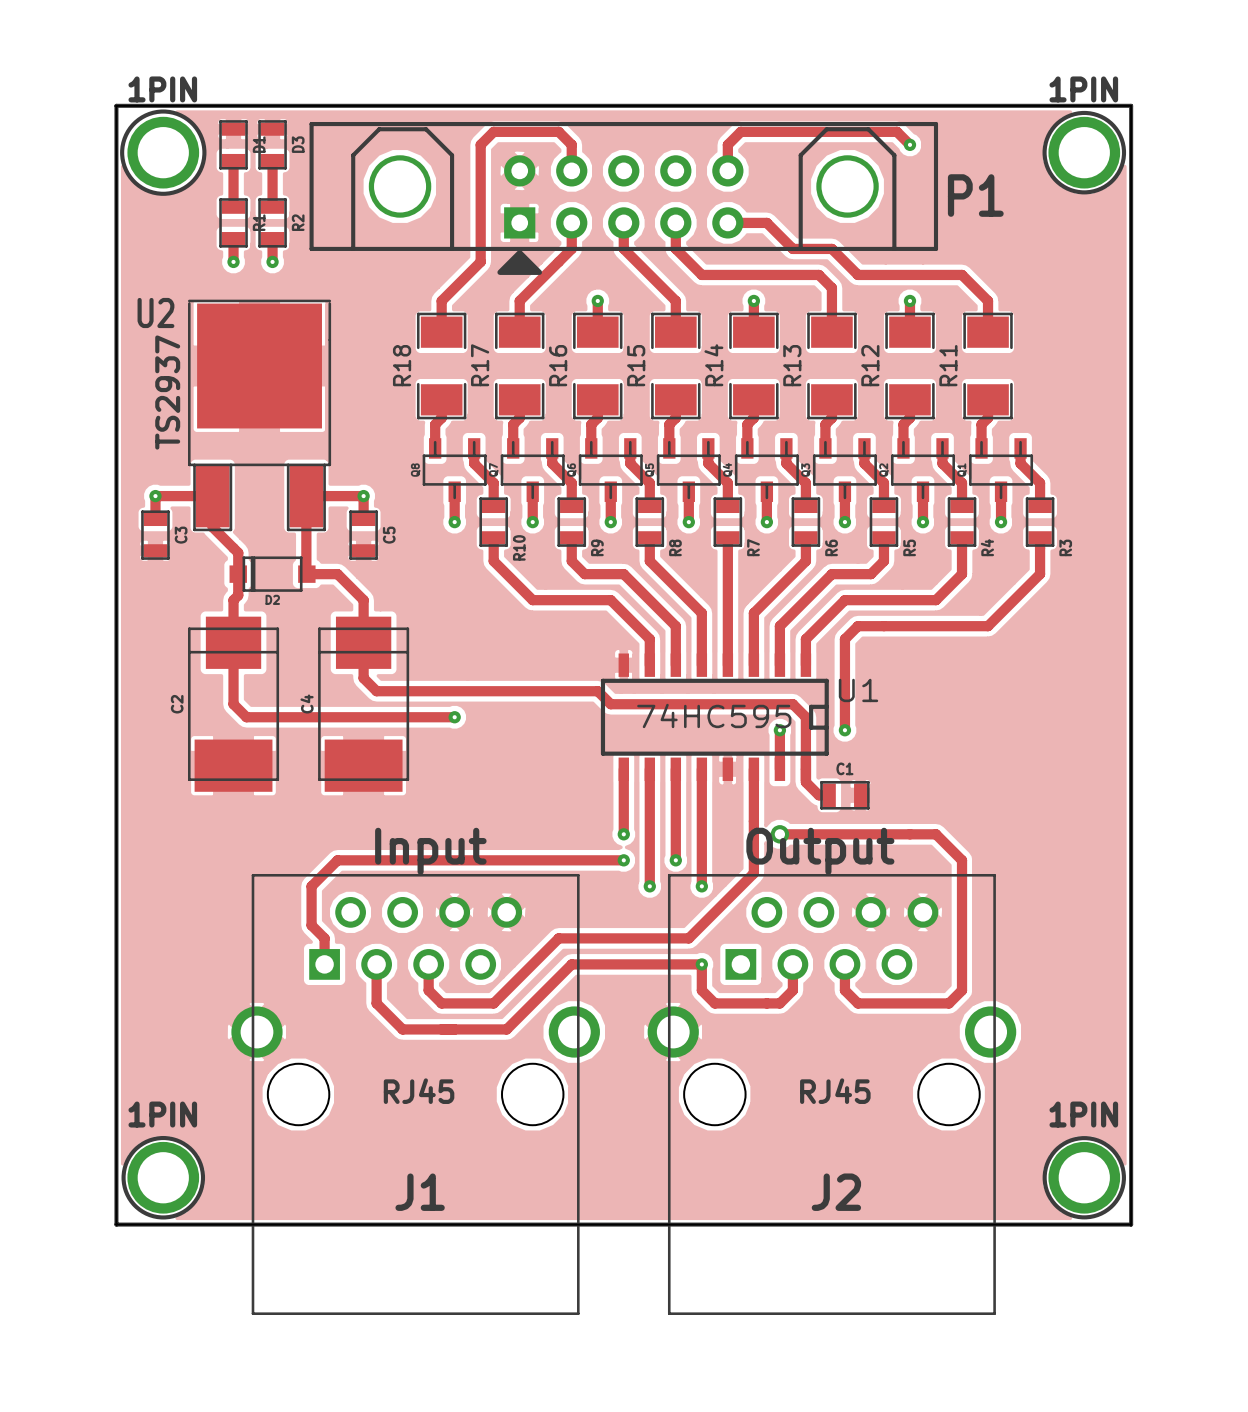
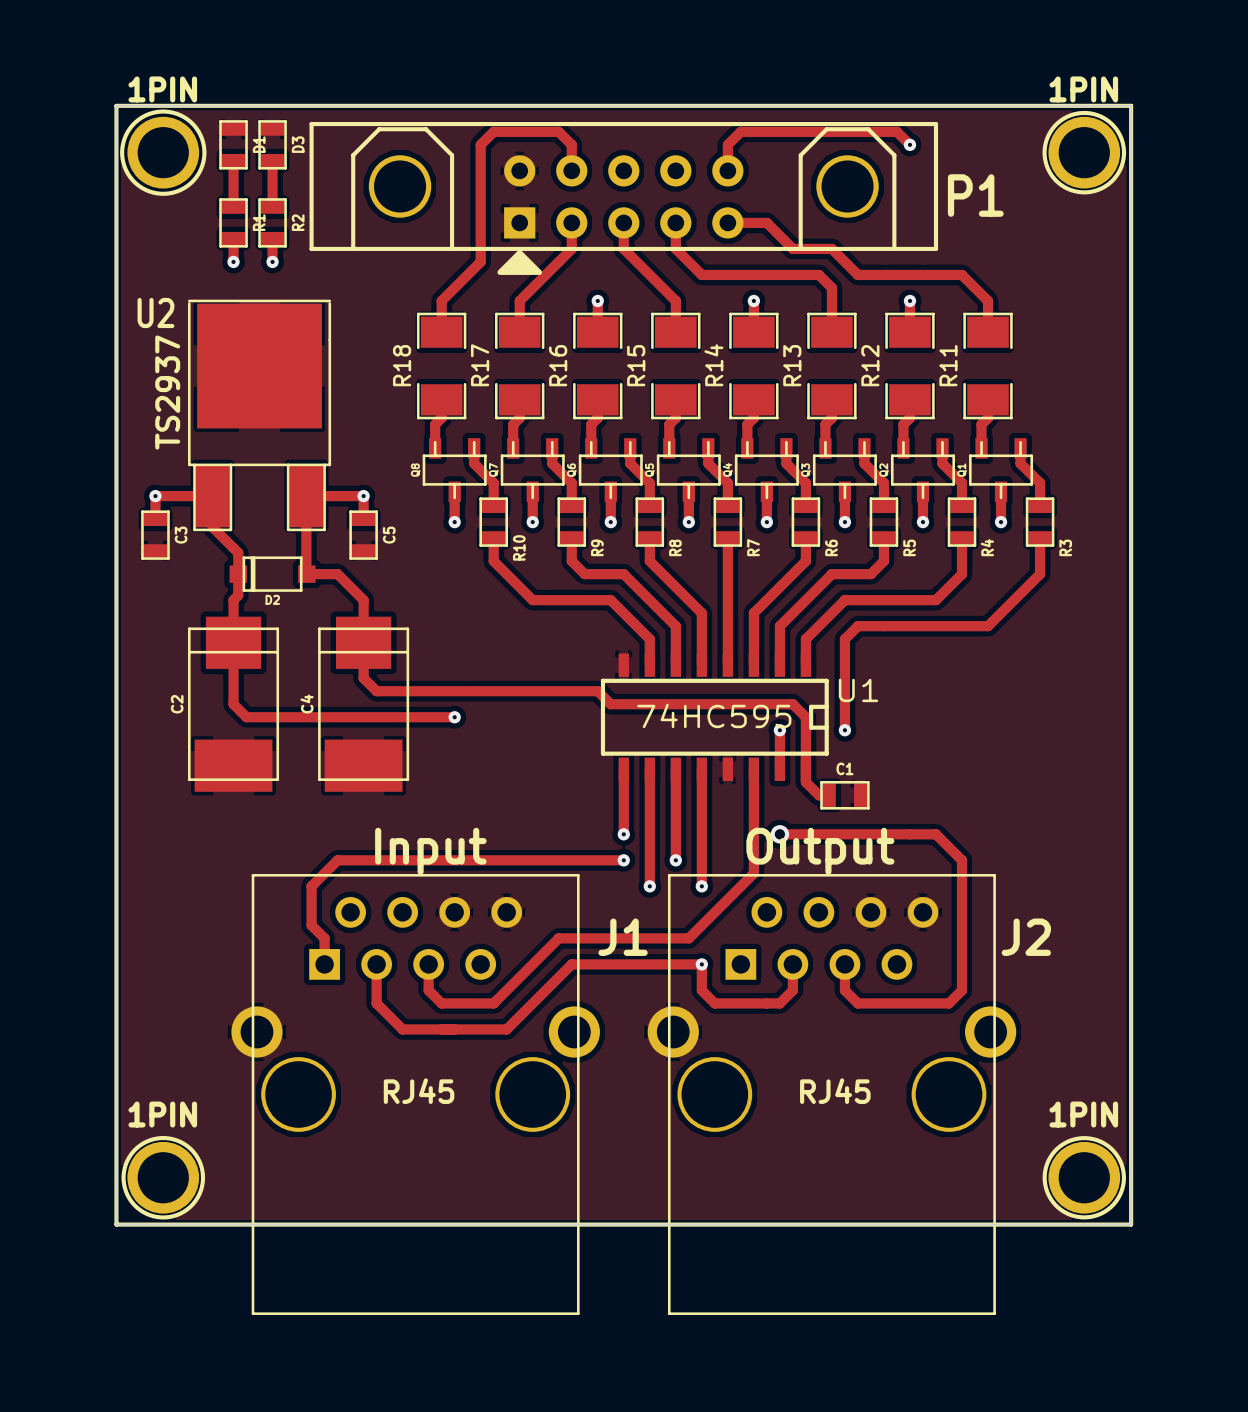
J1 footprint: [231, 873, 600, 1315] -> [231, 873, 600, 1315]
J2 footprint: [647, 873, 1017, 1315] -> [647, 873, 1017, 1315]
J1 name position: J1 (420, 1192) -> J1 (623, 937)
J2 name position: J2 (836, 1192) -> J2 (1026, 937)

